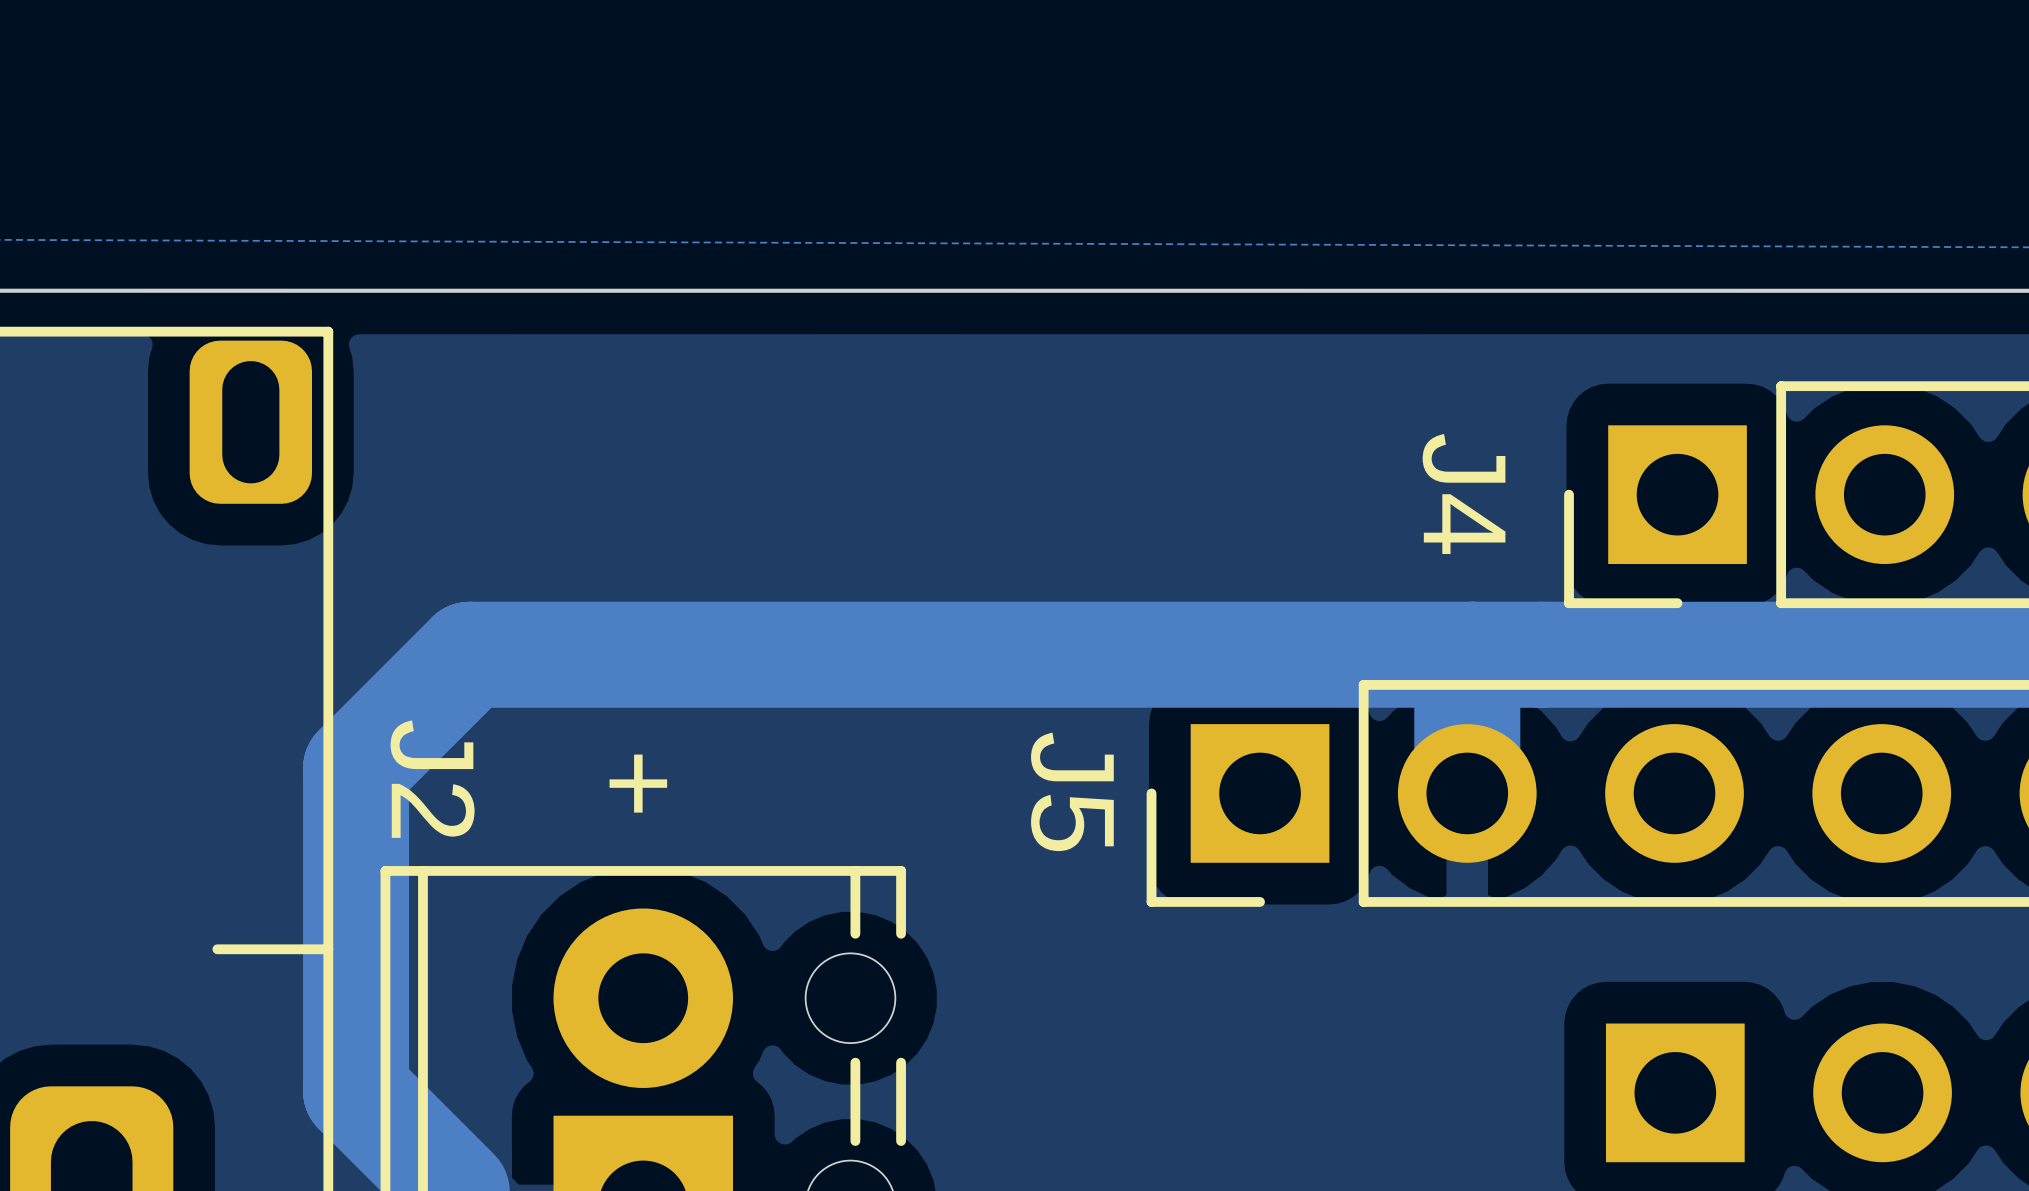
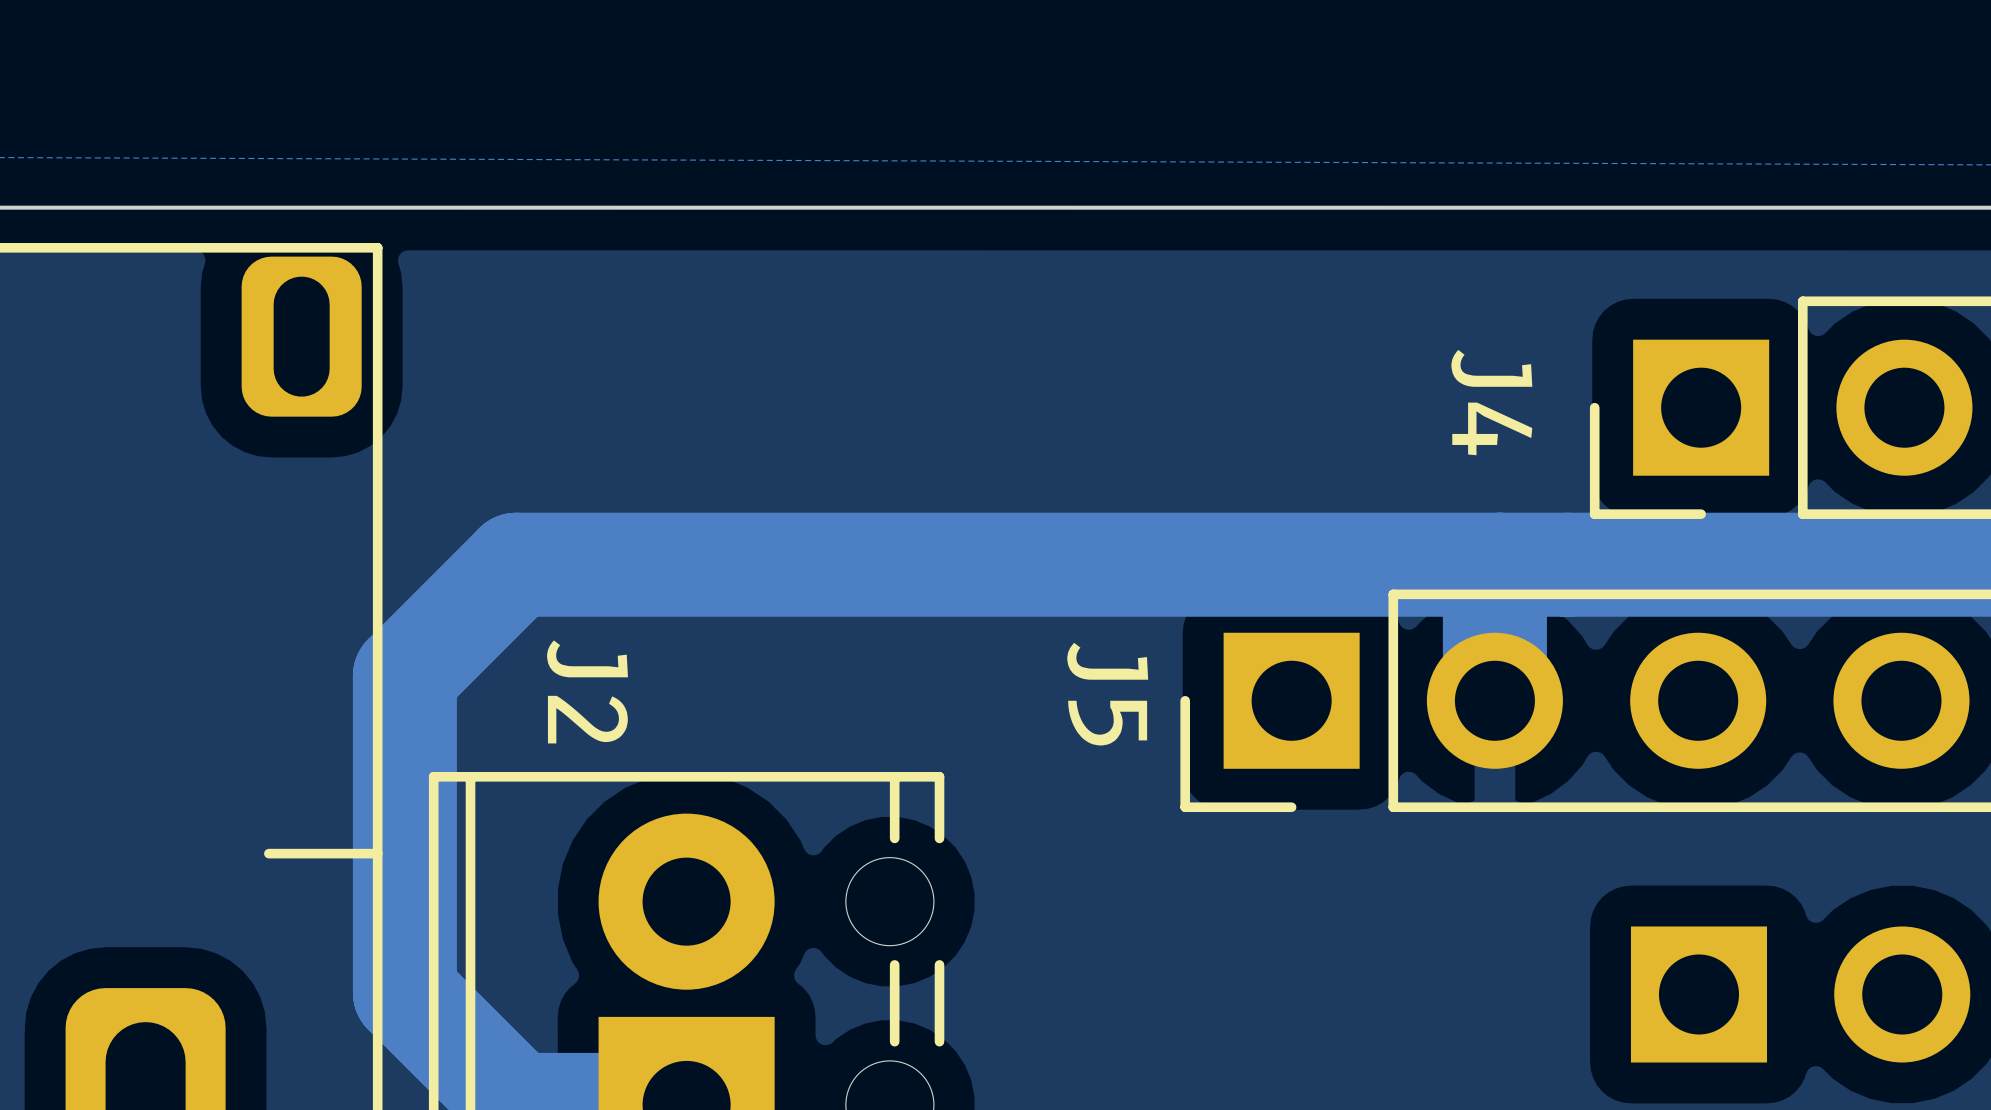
J2 name position: J2 (432, 779) -> J2 (587, 691)
text: + (638, 783) -> none

